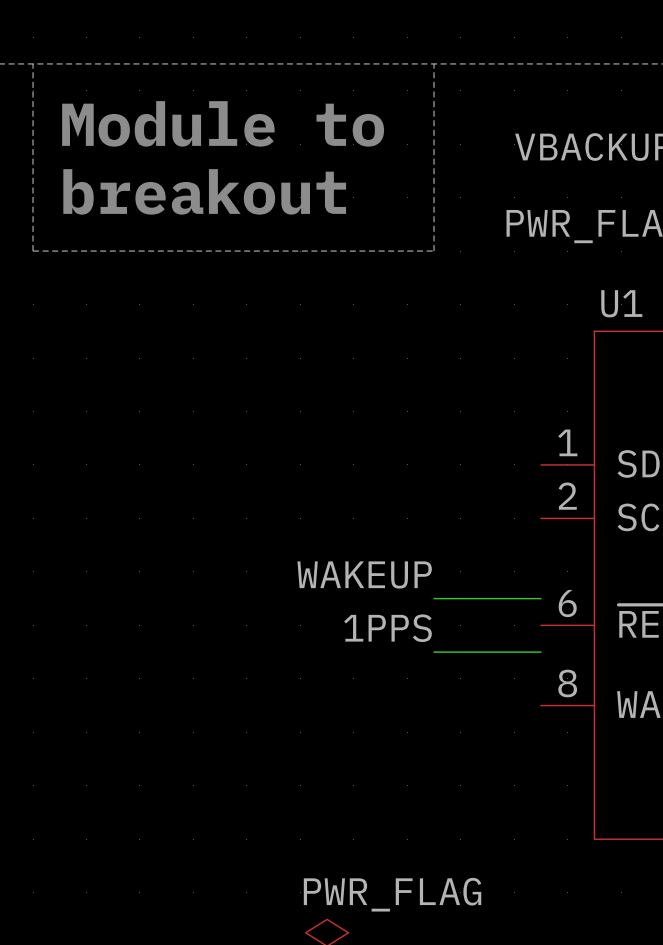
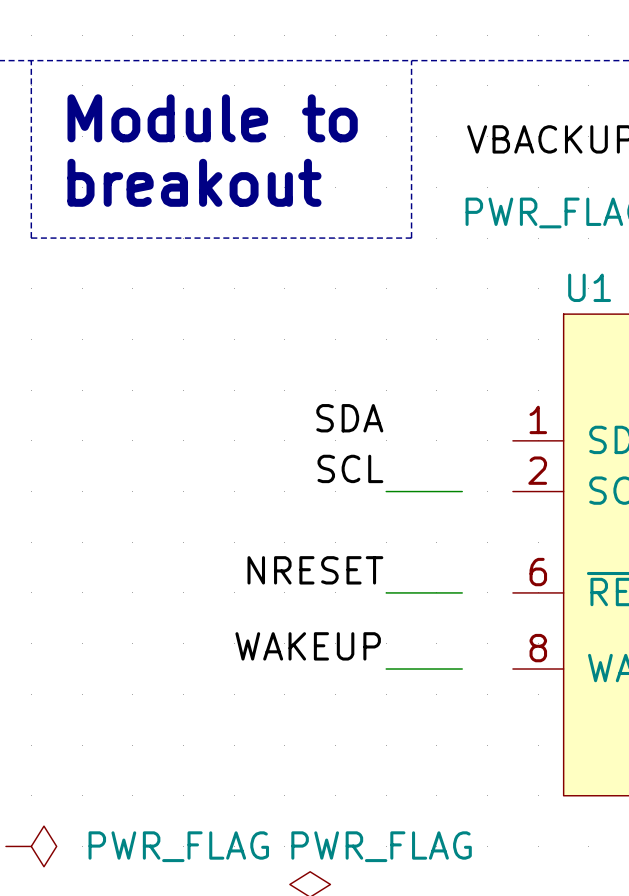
label: none -> SDA (349, 418)
label: none -> SCL (350, 468)
wire: none -> (386, 491) (462, 491)
label position: WAKEUP (364, 574) -> WAKEUP (308, 646)
wire: (434, 598) (540, 598) -> none
label: none -> NRESET (315, 570)
wire: none -> (386, 592) (462, 592)
label: 1PPS (387, 628) -> none
wire: (434, 652) (540, 652) -> none
wire: none -> (386, 669) (462, 669)
power symbol: none -> PWR_FLAG (31, 846)

